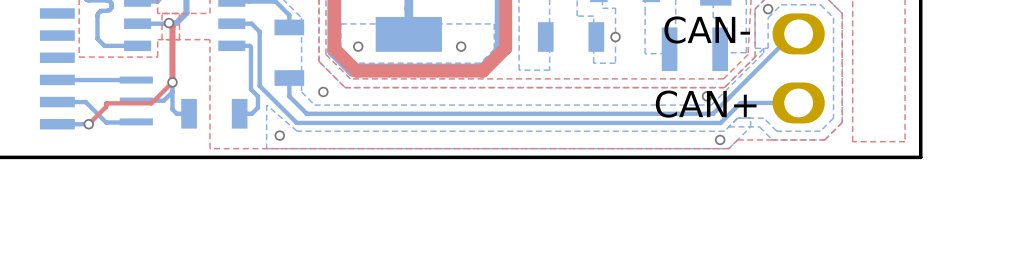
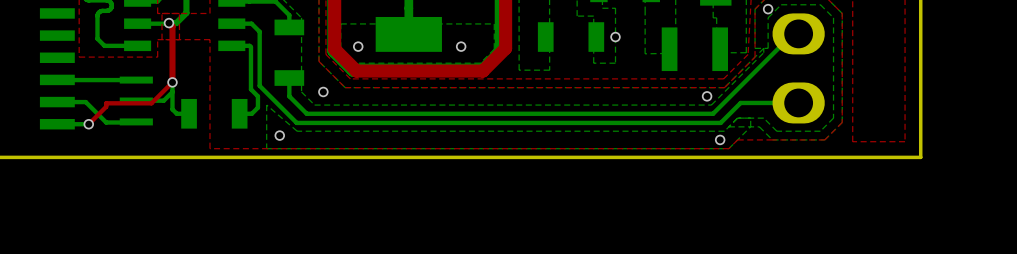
text: CAN- (707, 29) -> none
text: CAN+ (706, 104) -> none

